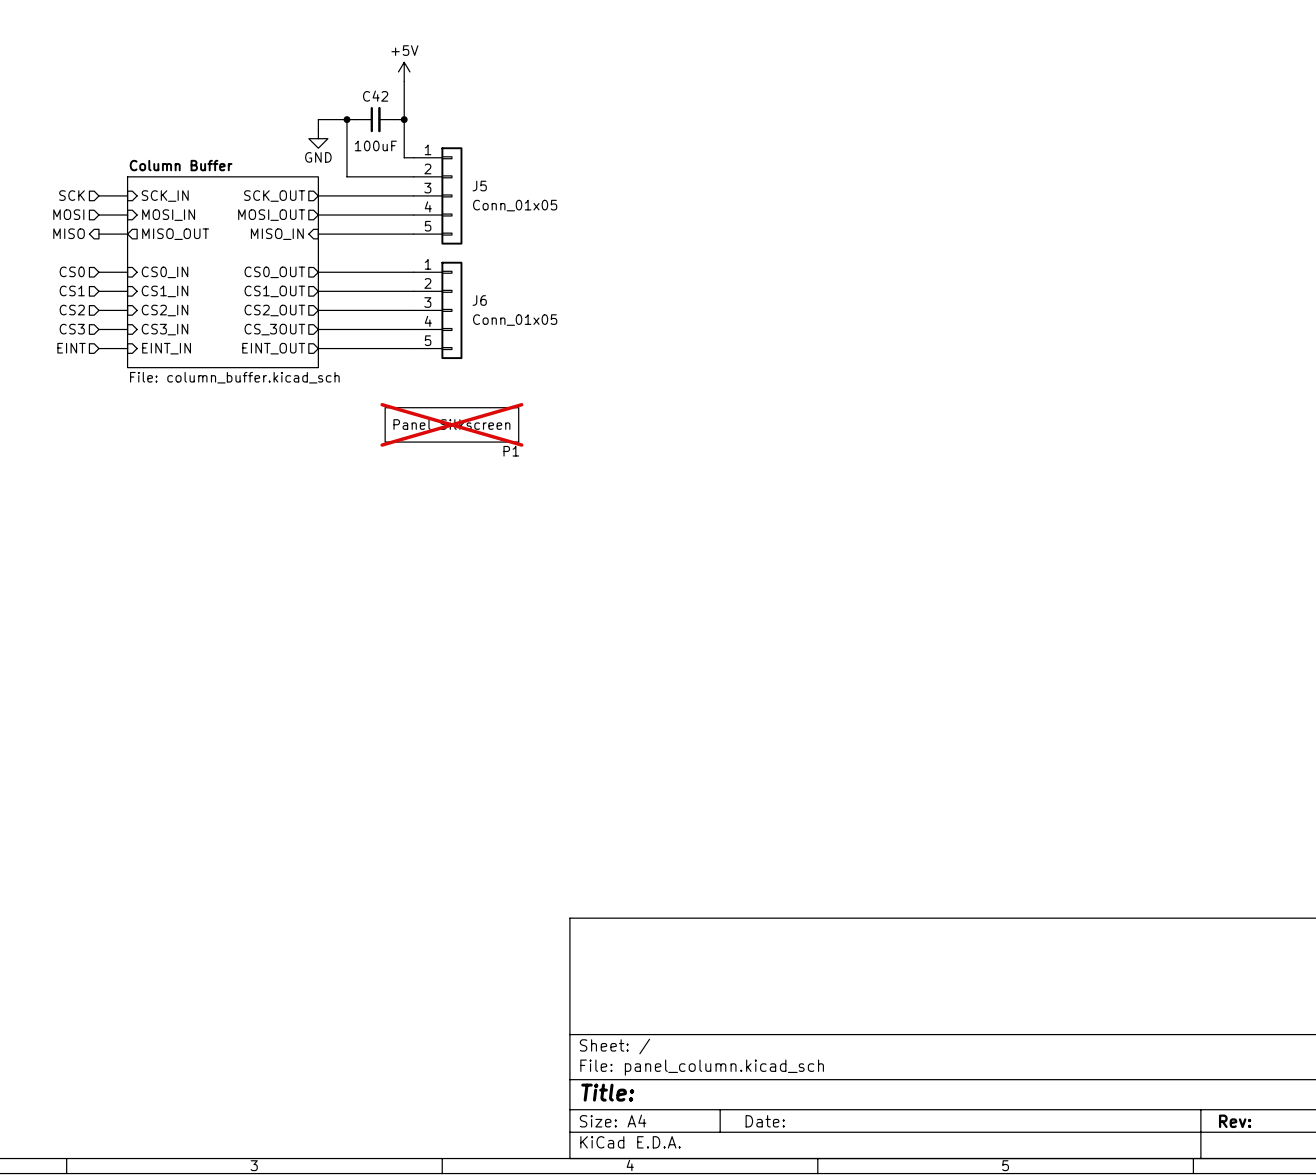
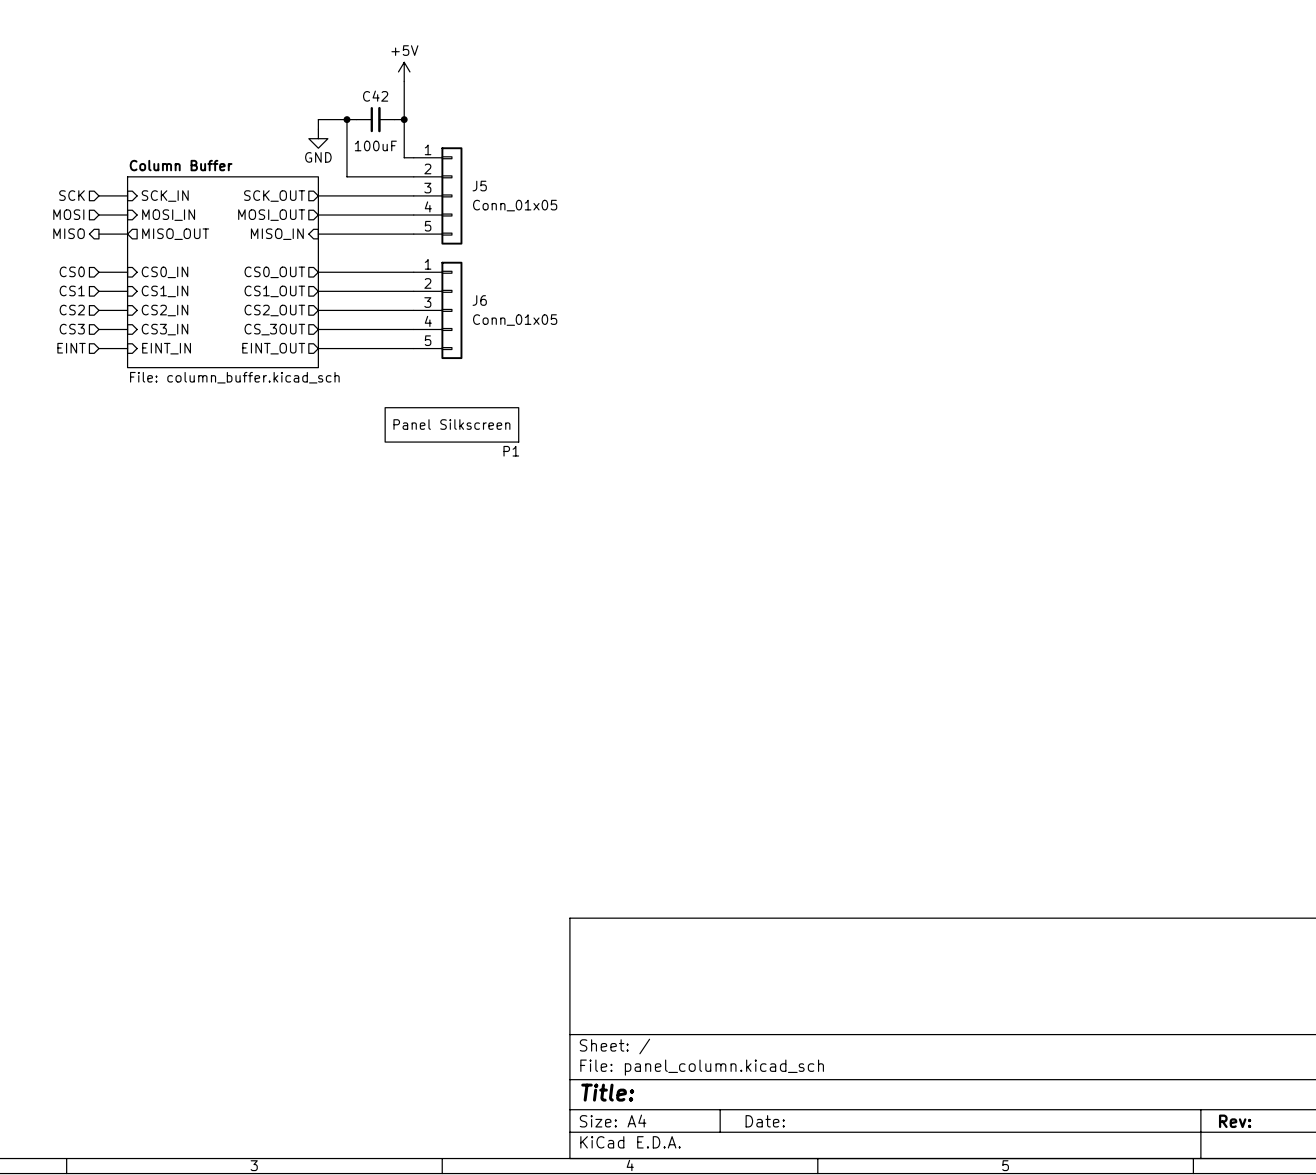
P1 do-not-place cross: (451, 424) -> none

